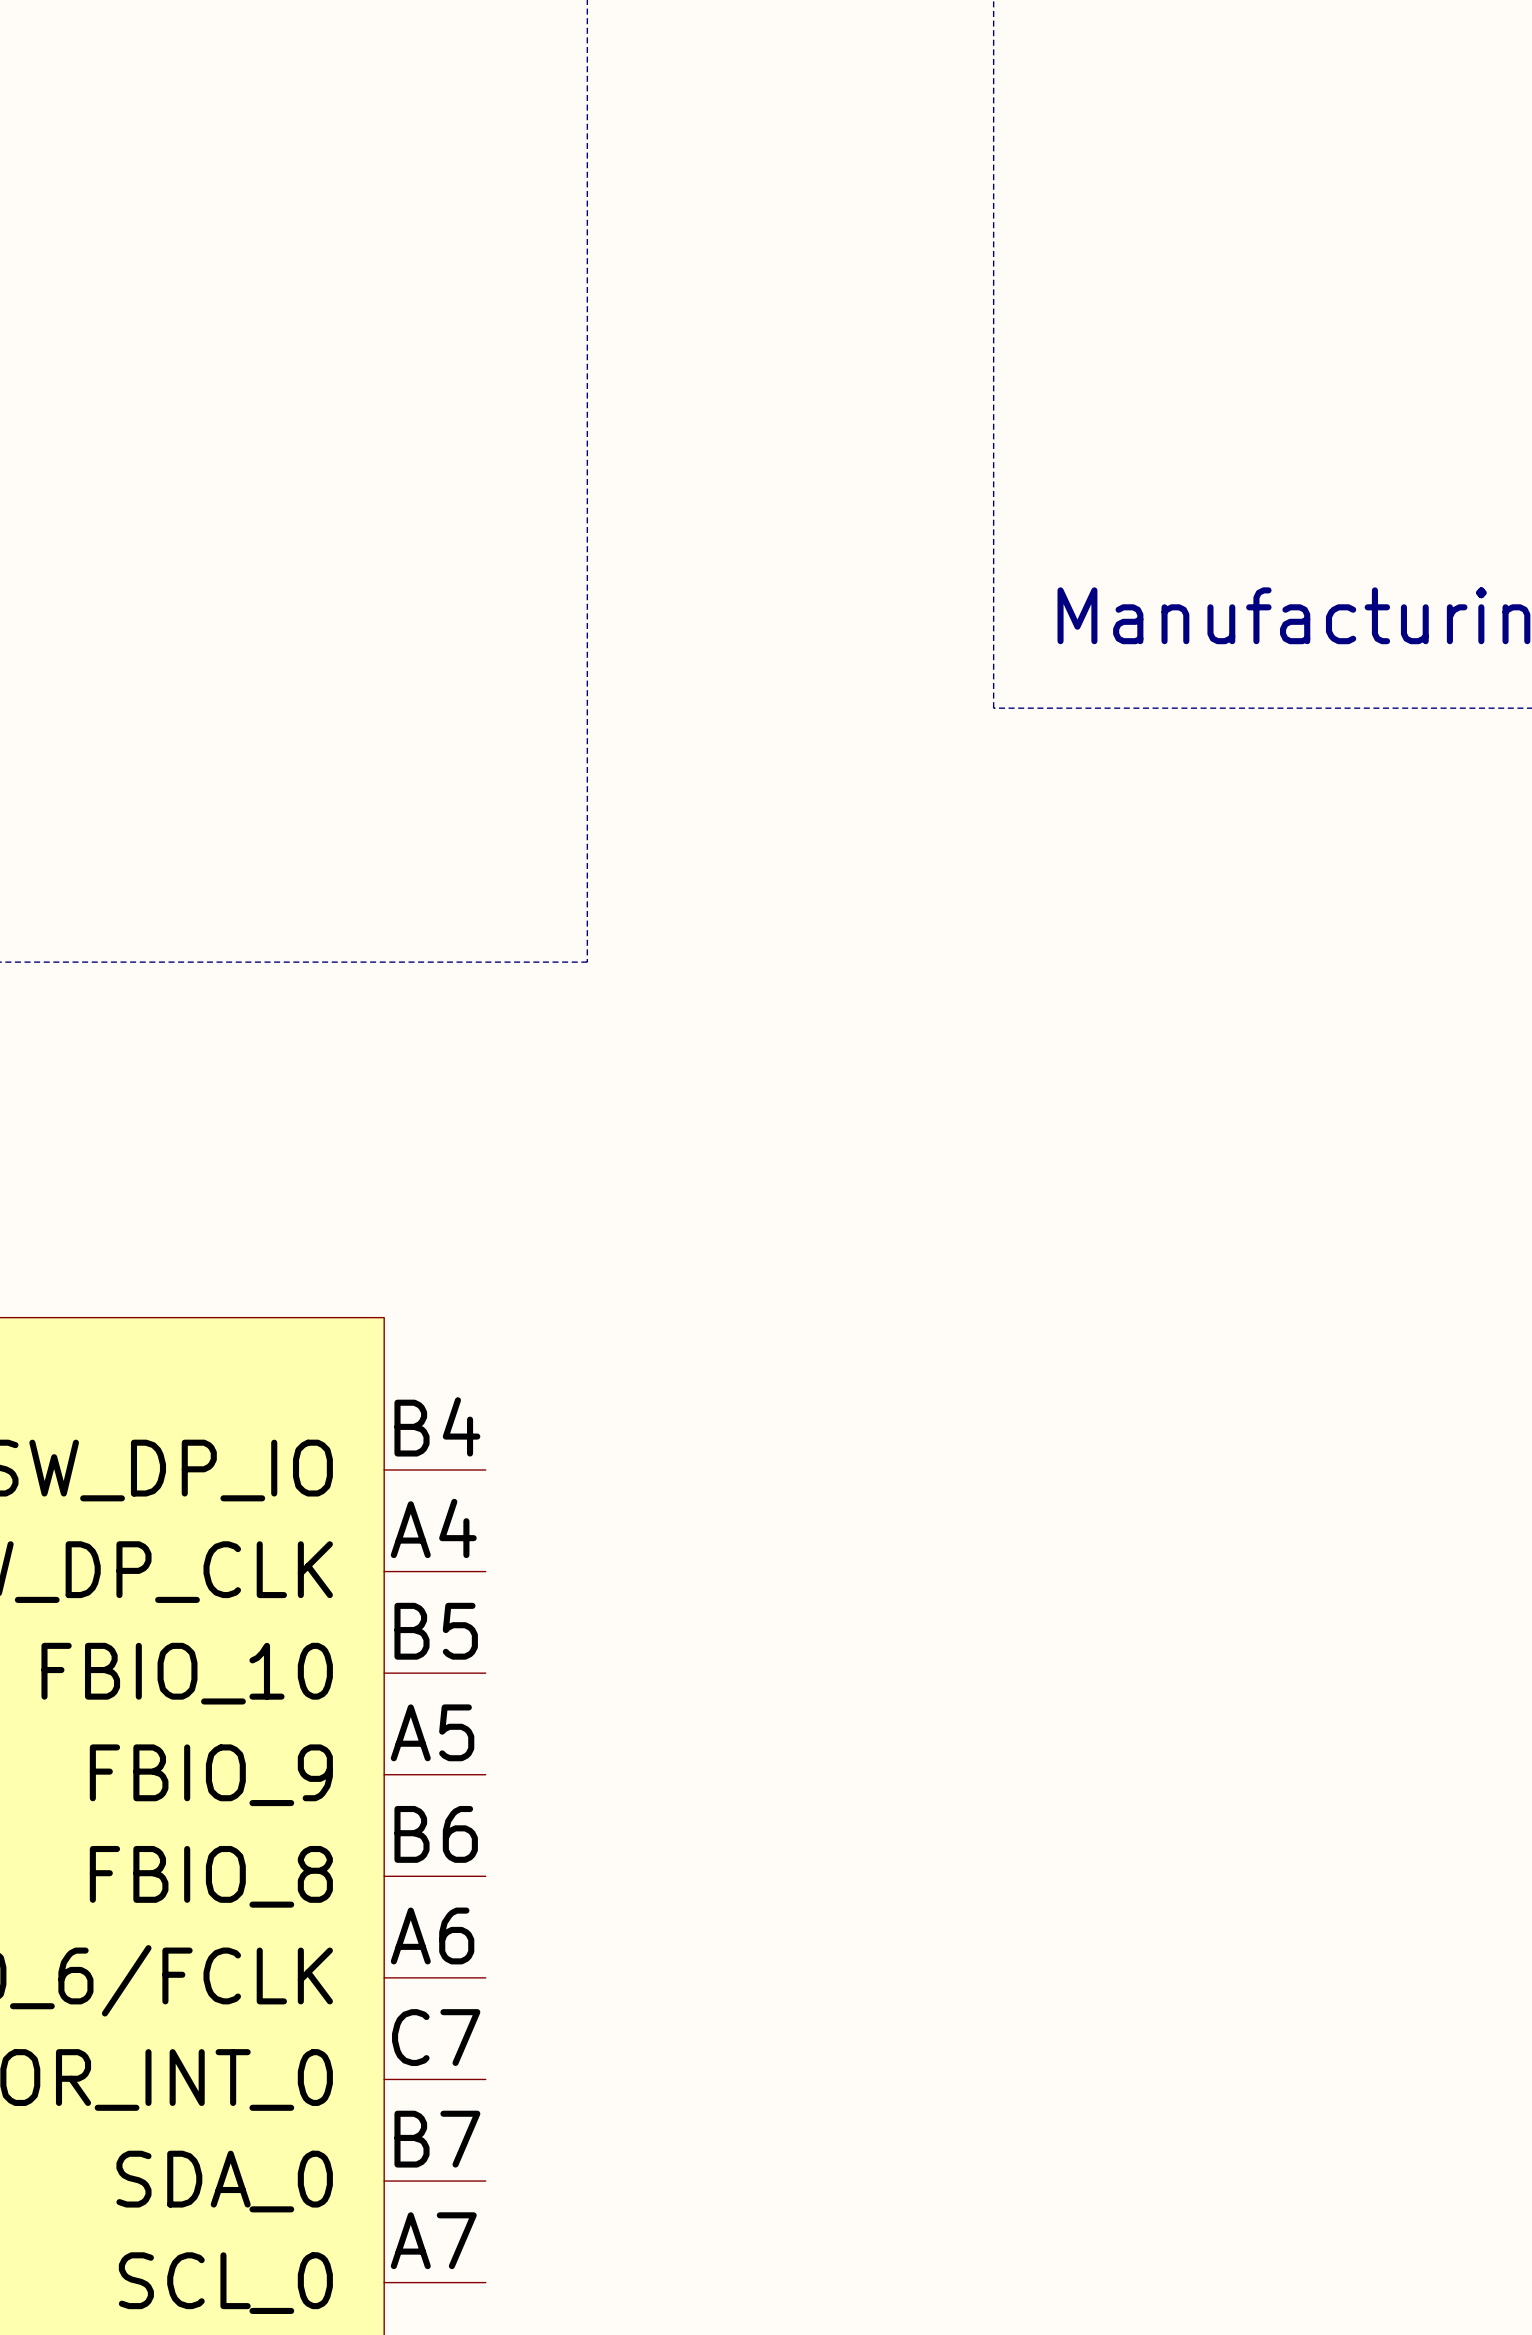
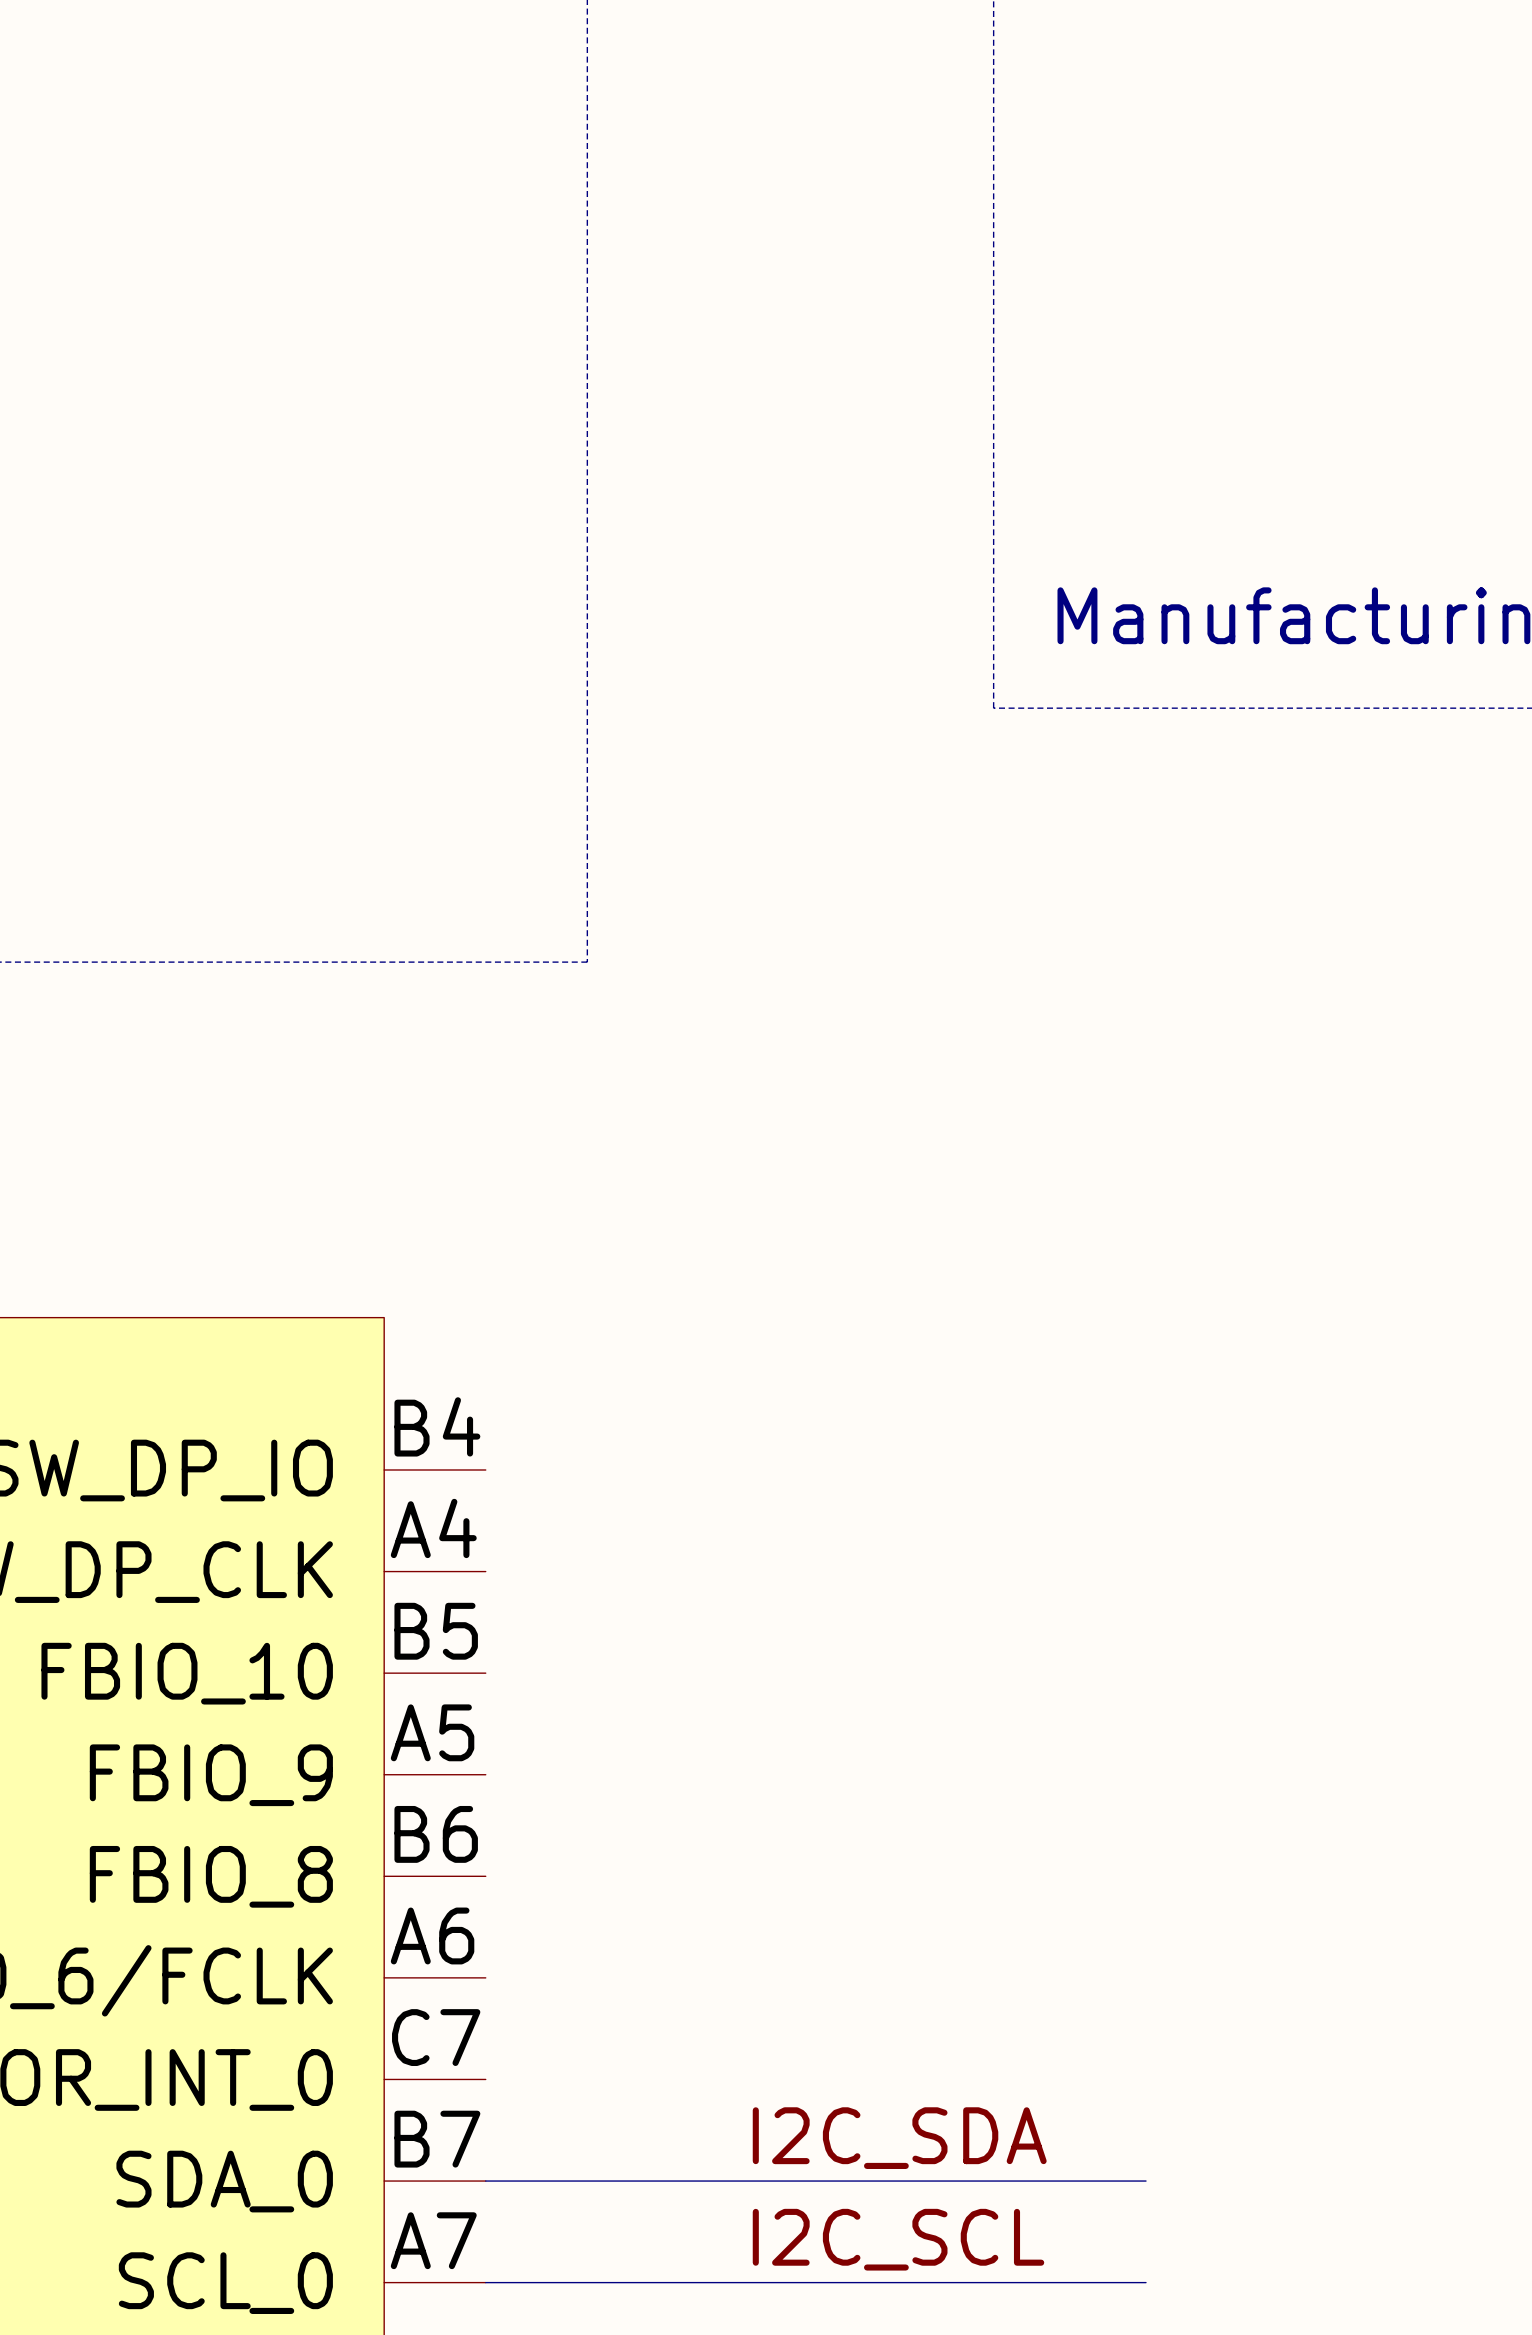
label: none -> I2C_SDA (899, 2138)
wire: none -> (485, 2181) (1146, 2181)
label: none -> I2C_SCL (898, 2239)
wire: none -> (485, 2282) (1146, 2282)

